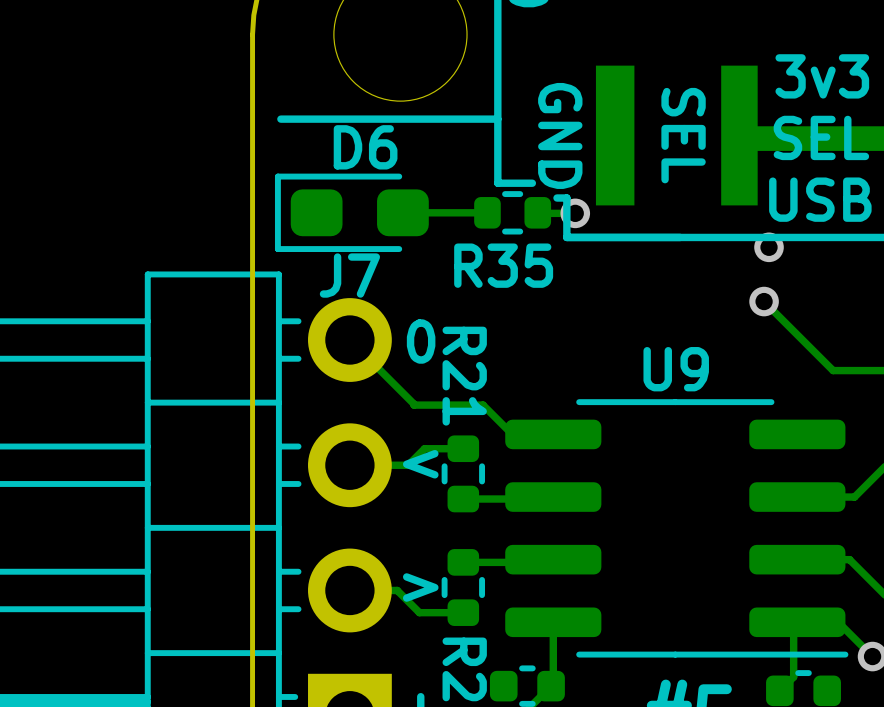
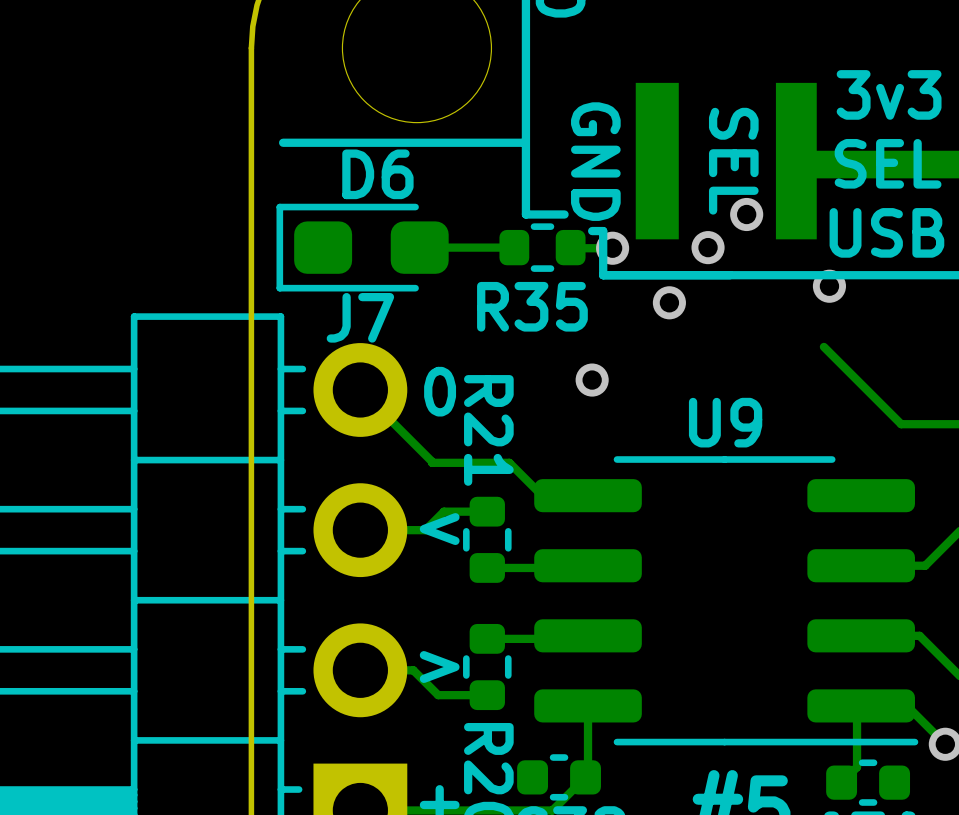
via: none -> (746, 214)
via: none -> (708, 247)
via: none -> (669, 302)
via: (764, 301) -> none
via: none -> (592, 380)

